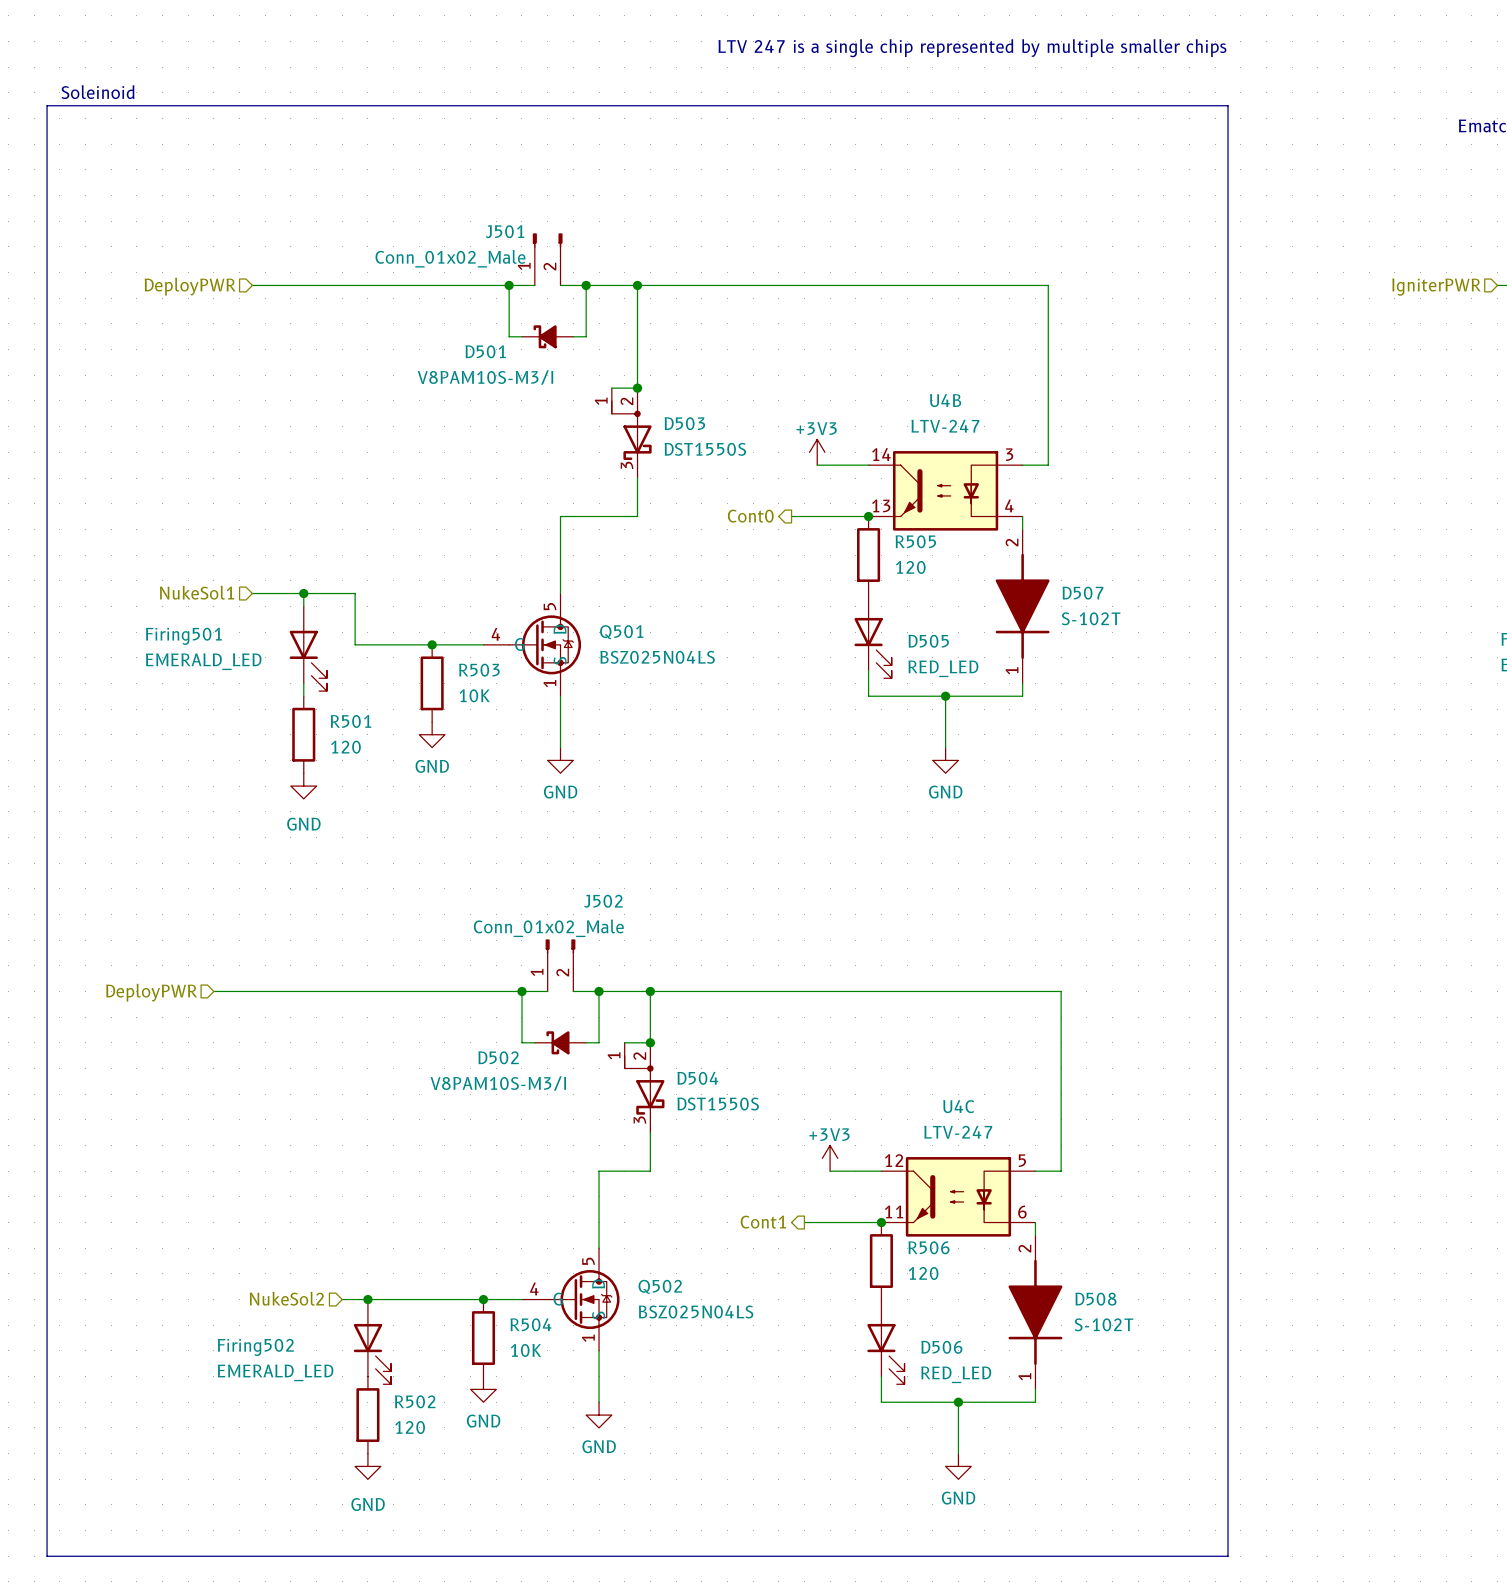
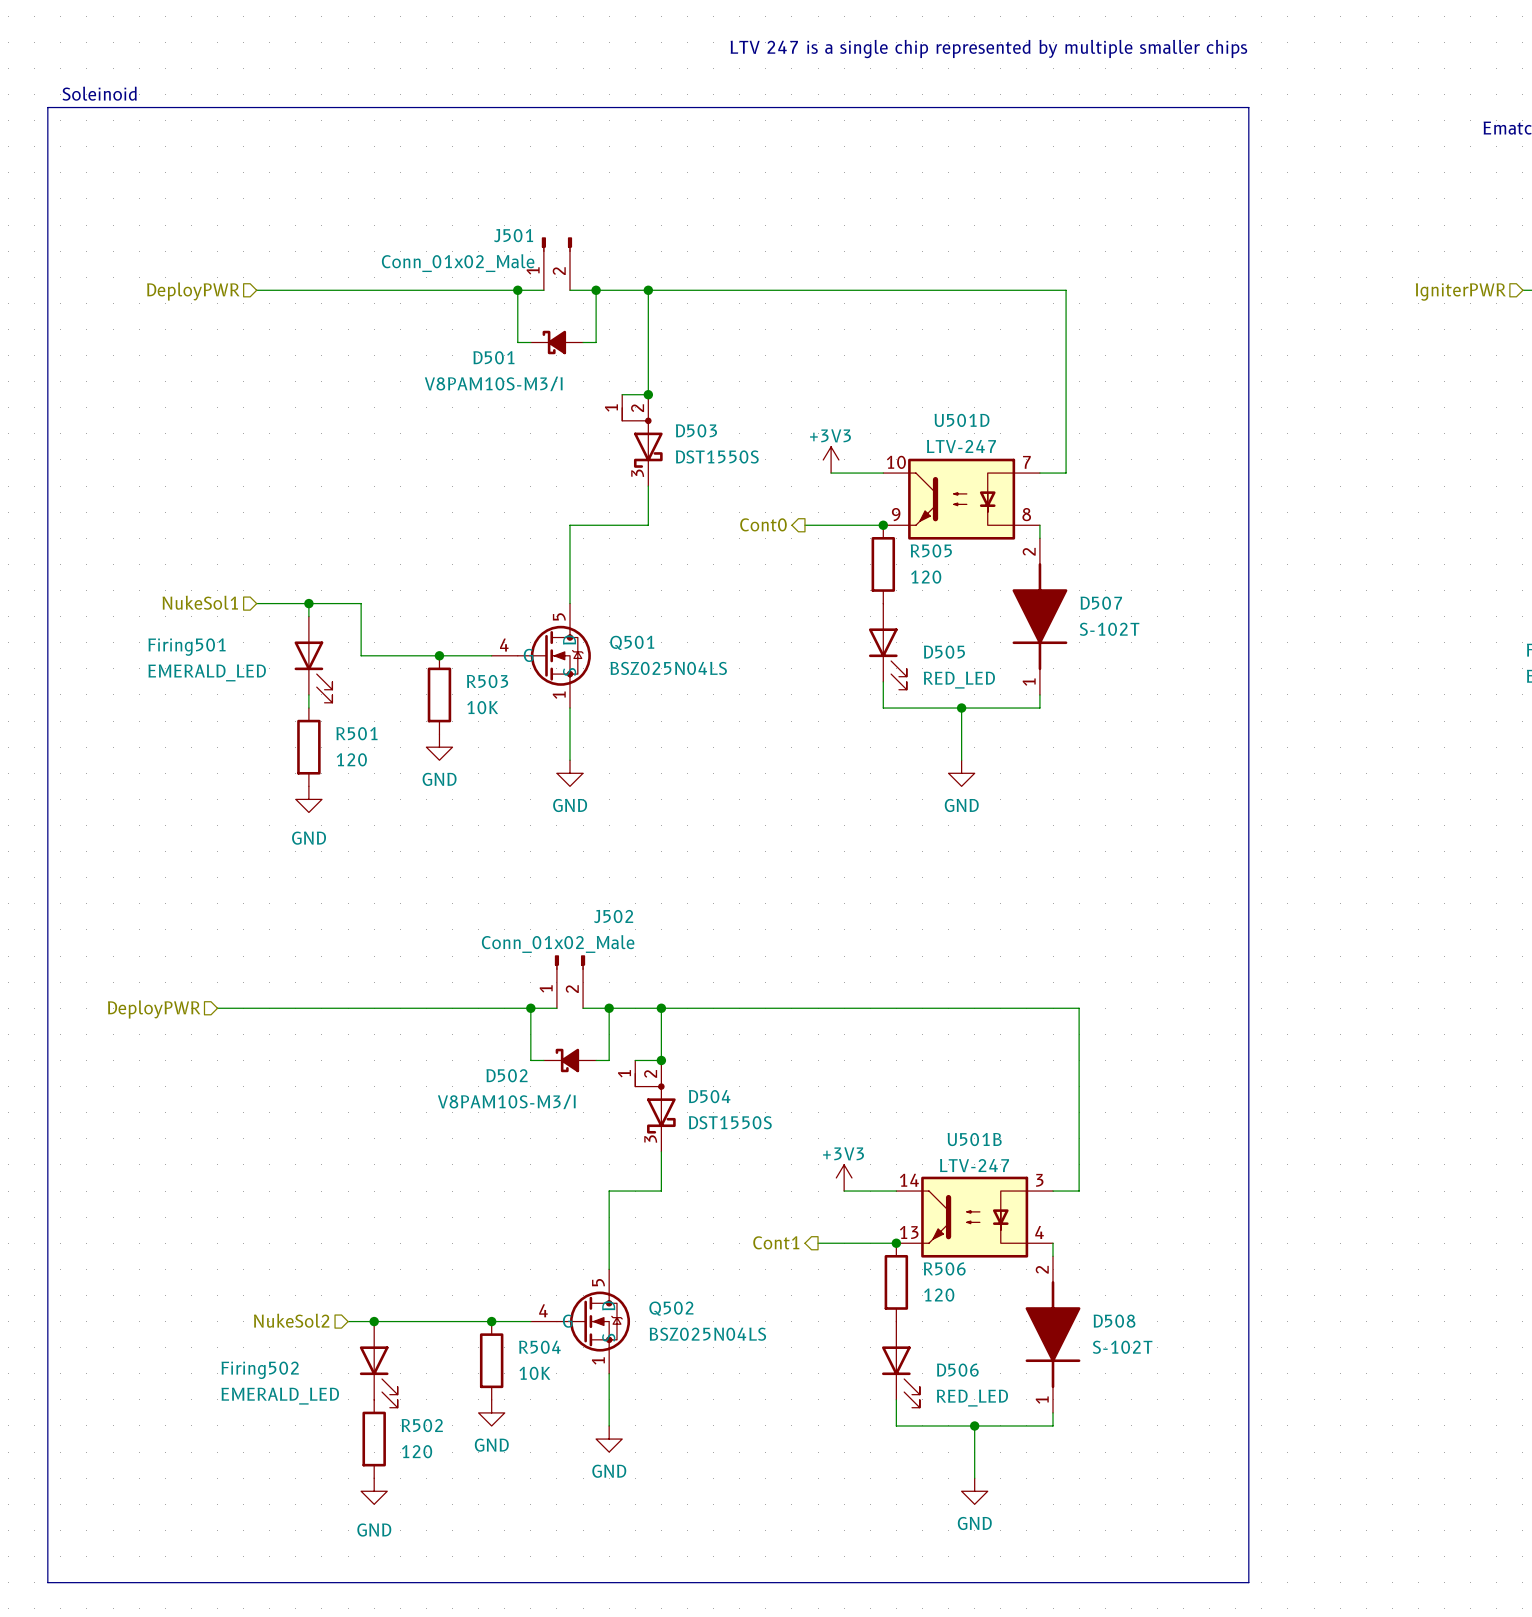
U4B: LTV-247 (945, 490) -> none
U501D: none -> LTV-247 (961, 499)
U4C: LTV-247 (958, 1196) -> none
U501B: none -> LTV-247 (974, 1217)

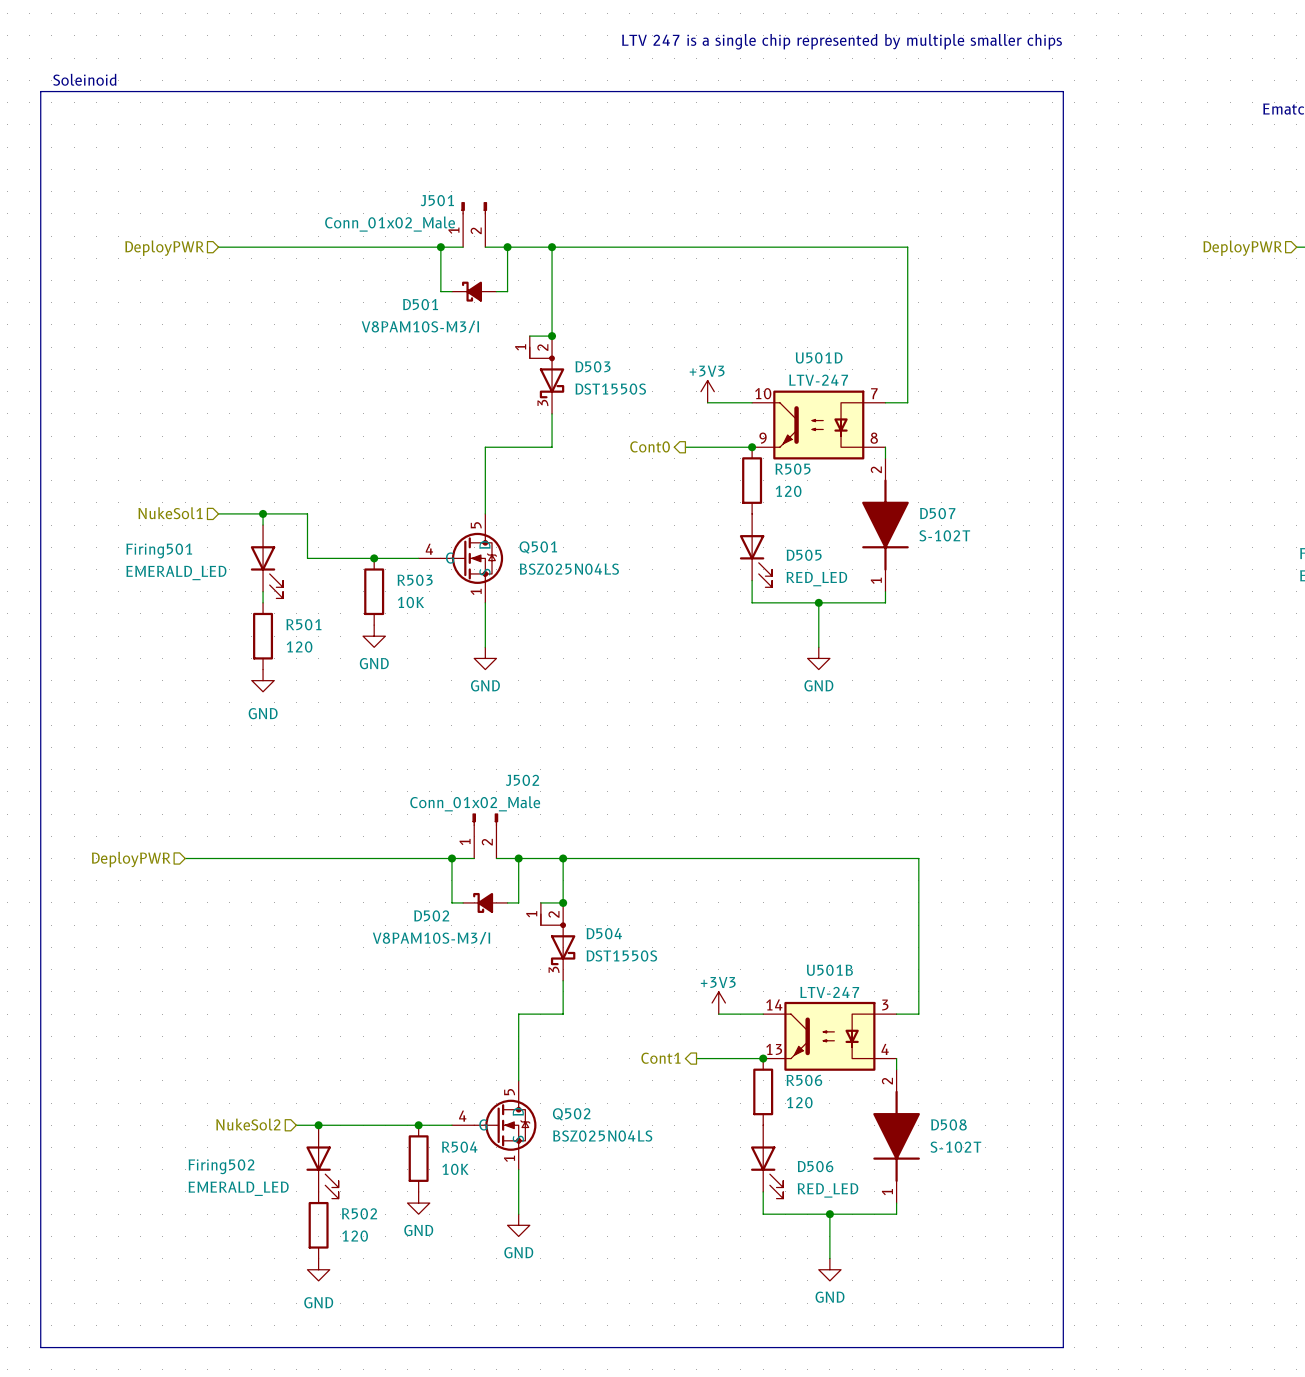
hierarchical label: IgniterPWR (1460, 292) -> DeployPWR (1242, 248)

